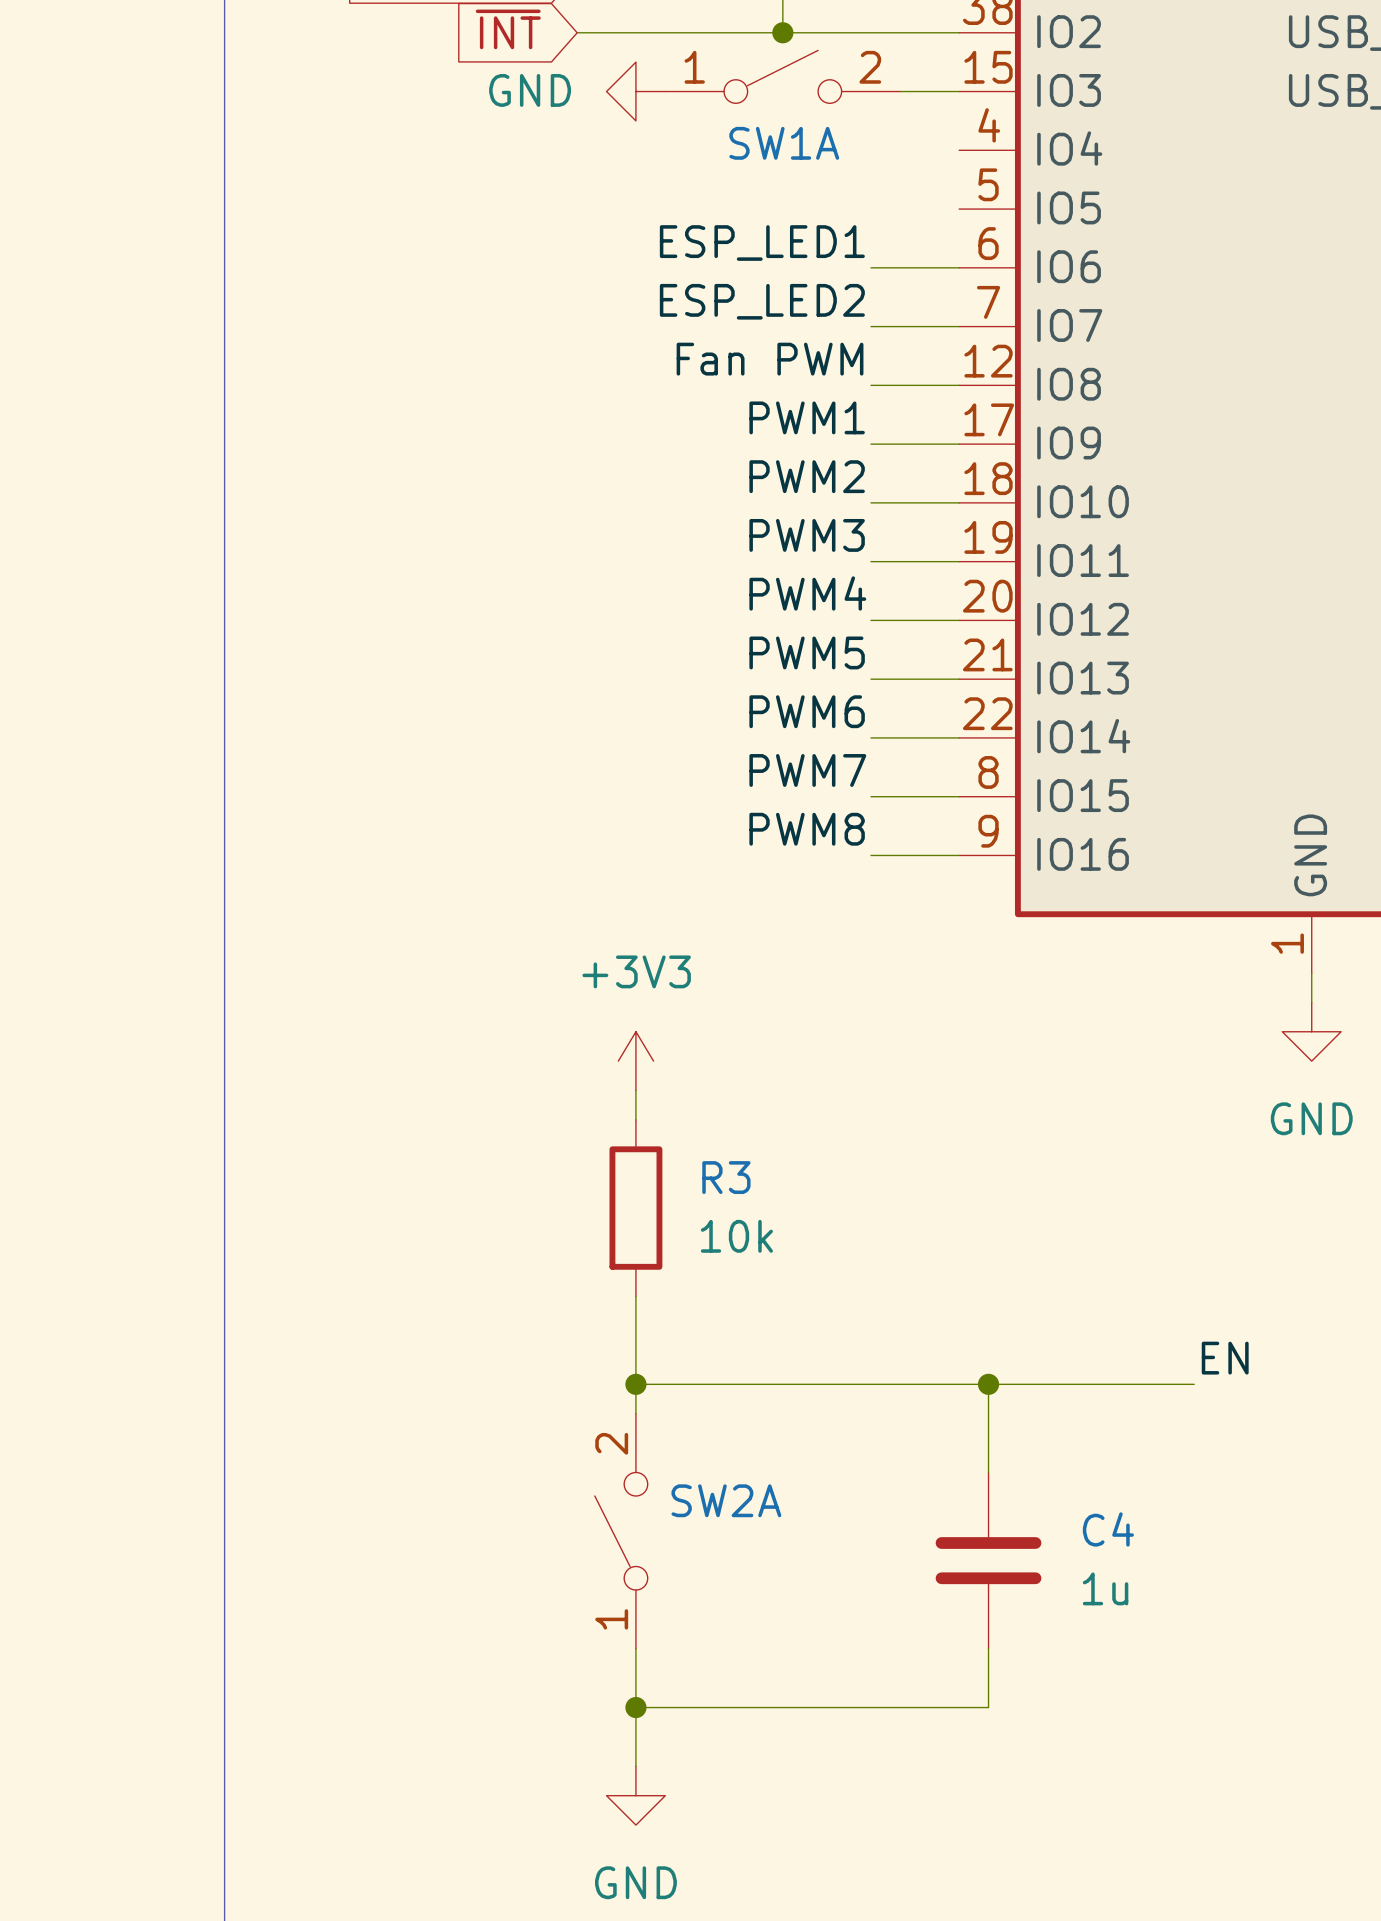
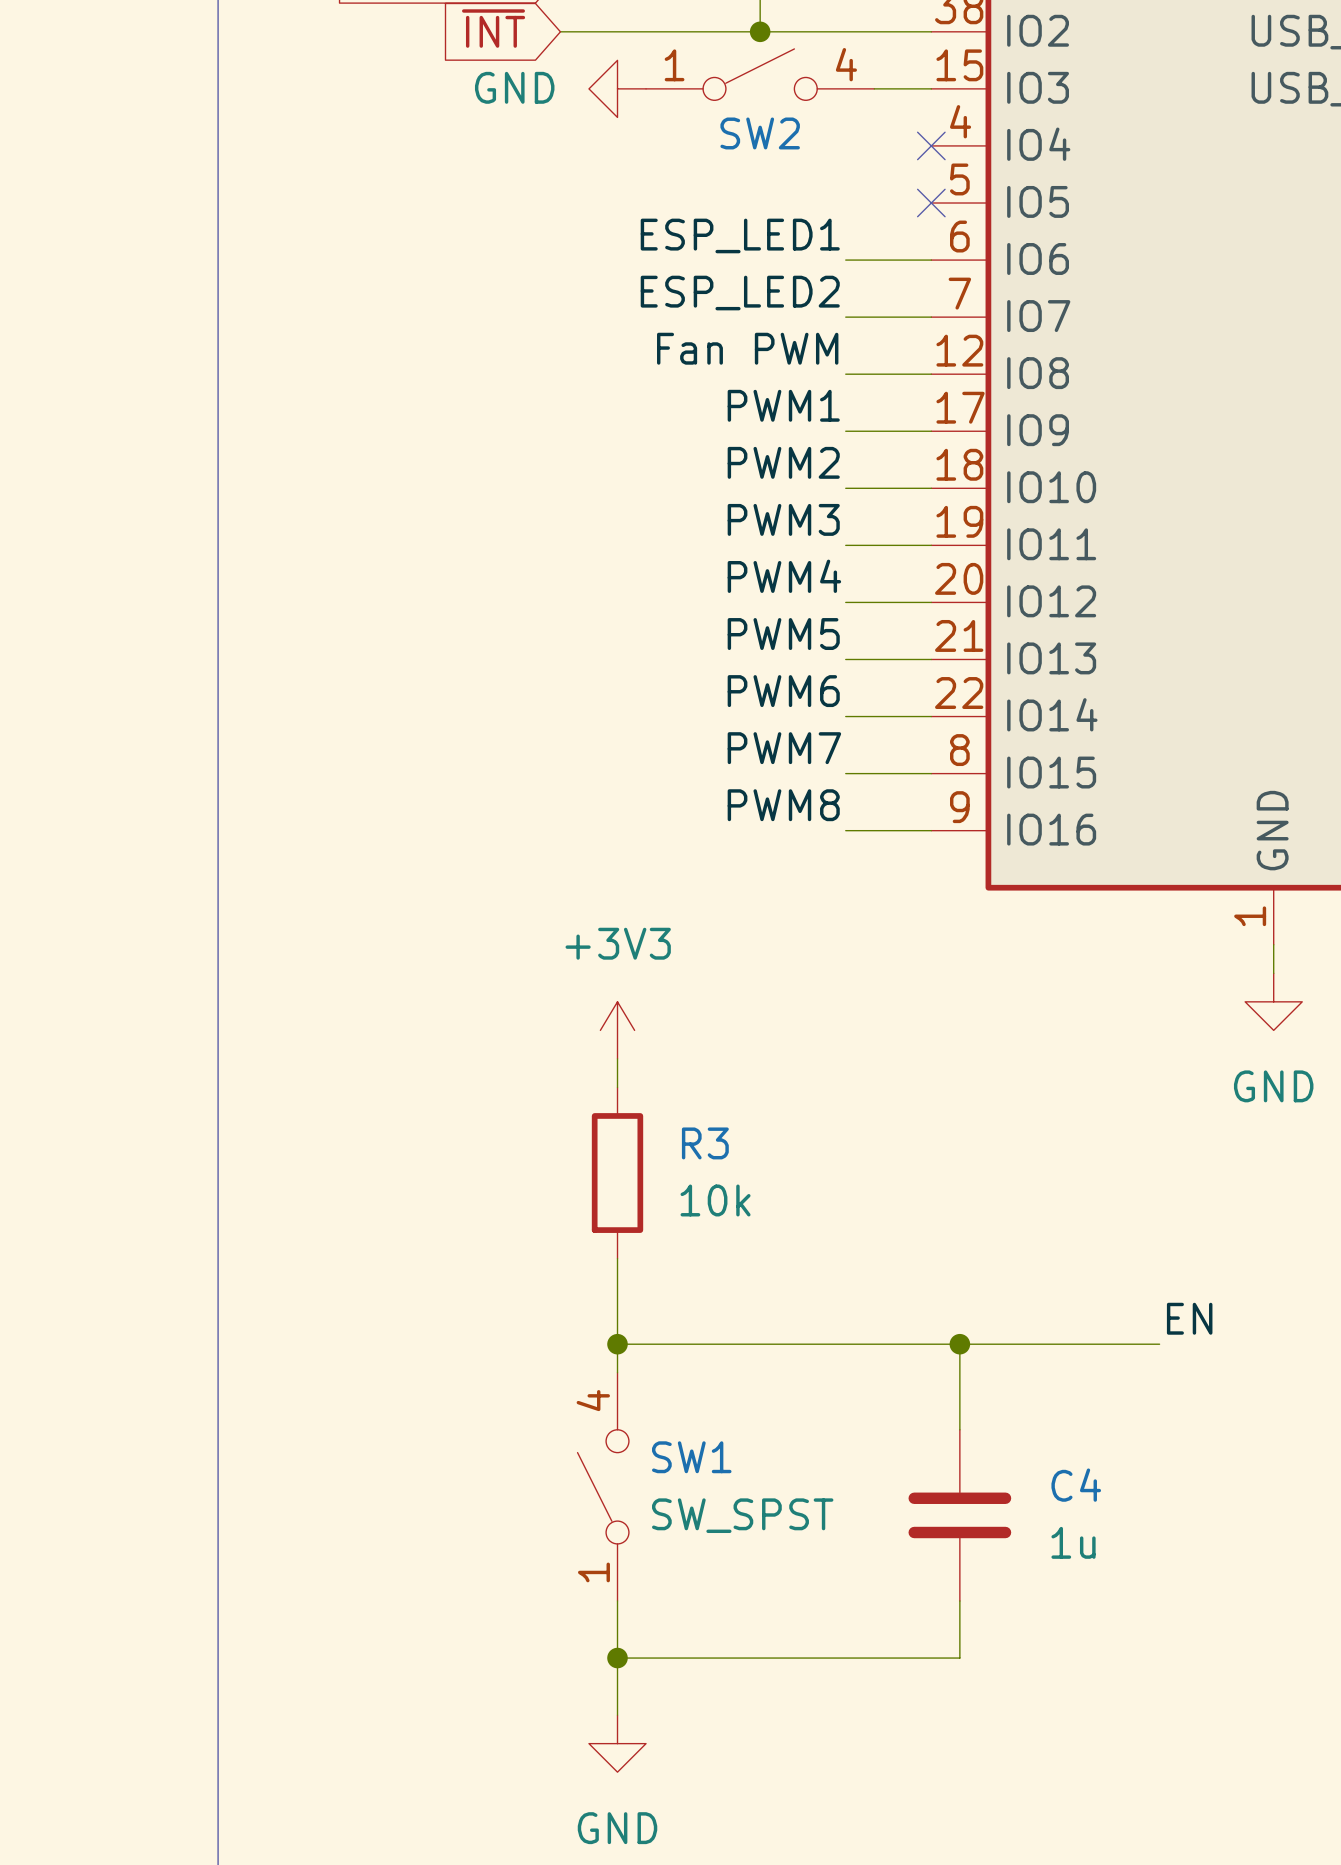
SW1A pin number: 2 (870, 67) -> 4 (846, 64)
SW1A name: SW1A (784, 143) -> SW2 (760, 133)
no-connect mark: none -> (931, 145)
no-connect mark: none -> (931, 203)
SW2A pin number: 2 (611, 1443) -> 4 (593, 1400)
SW2A name: SW2A (726, 1500) -> SW1 (691, 1457)
SW2A value: none -> SW_SPST (742, 1515)

